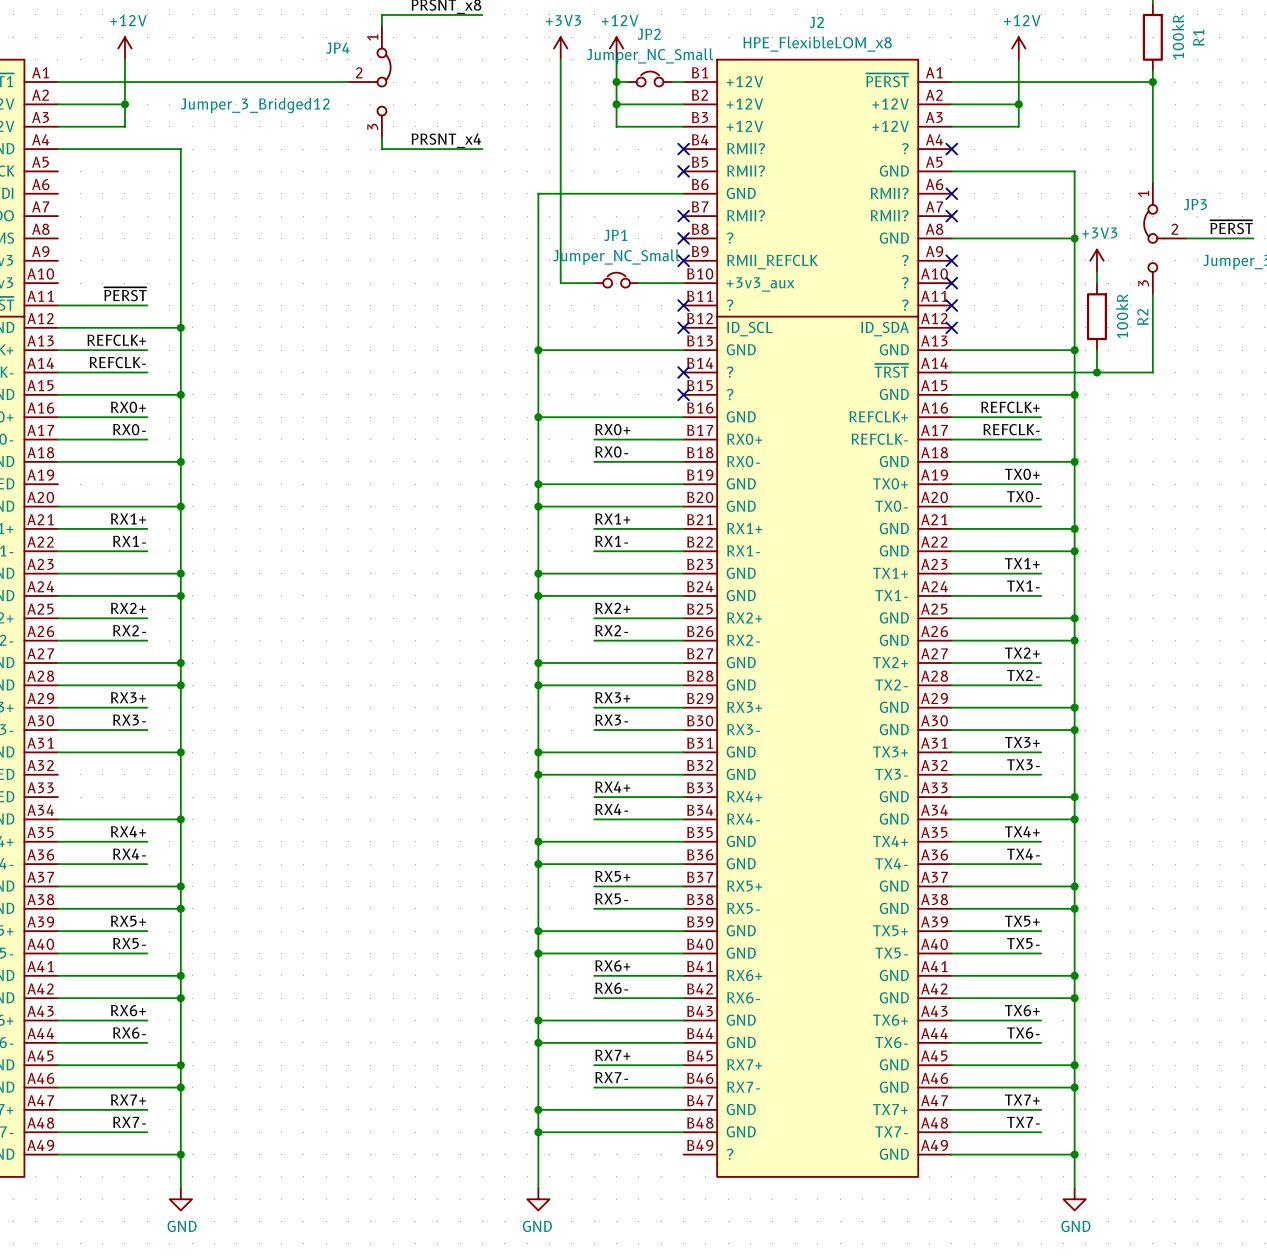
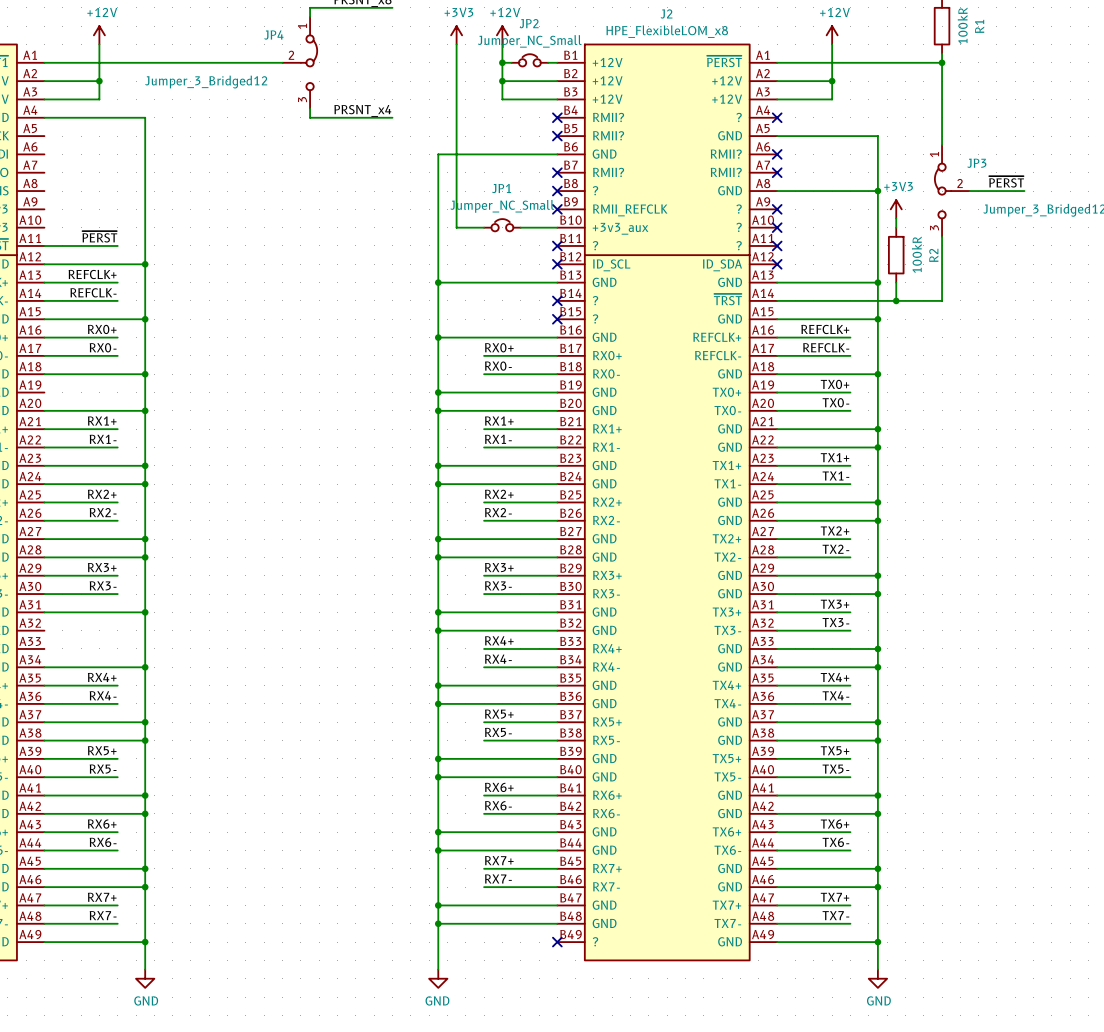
no-connect mark: none -> (557, 942)

